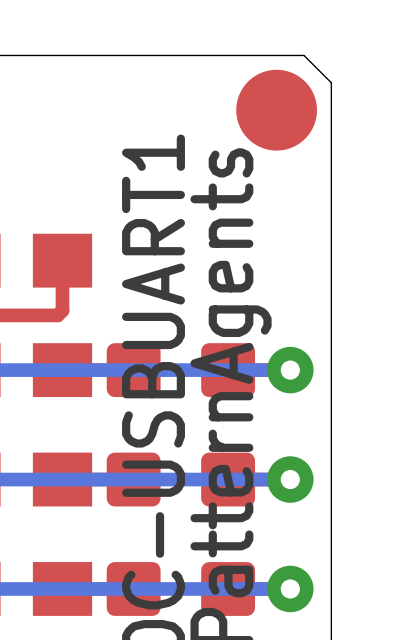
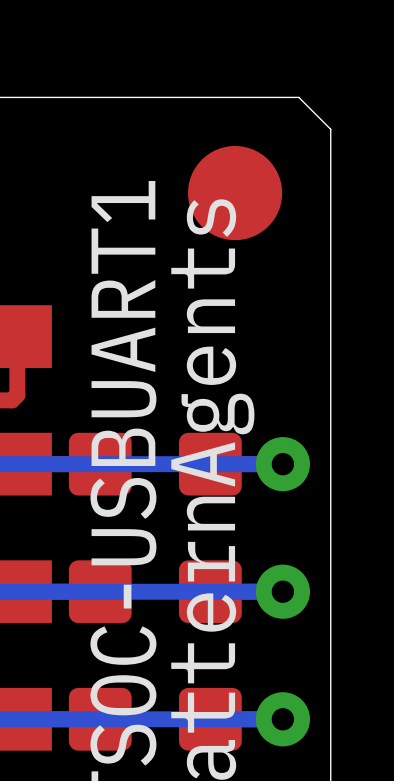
part position: (276, 110) -> (235, 193)

